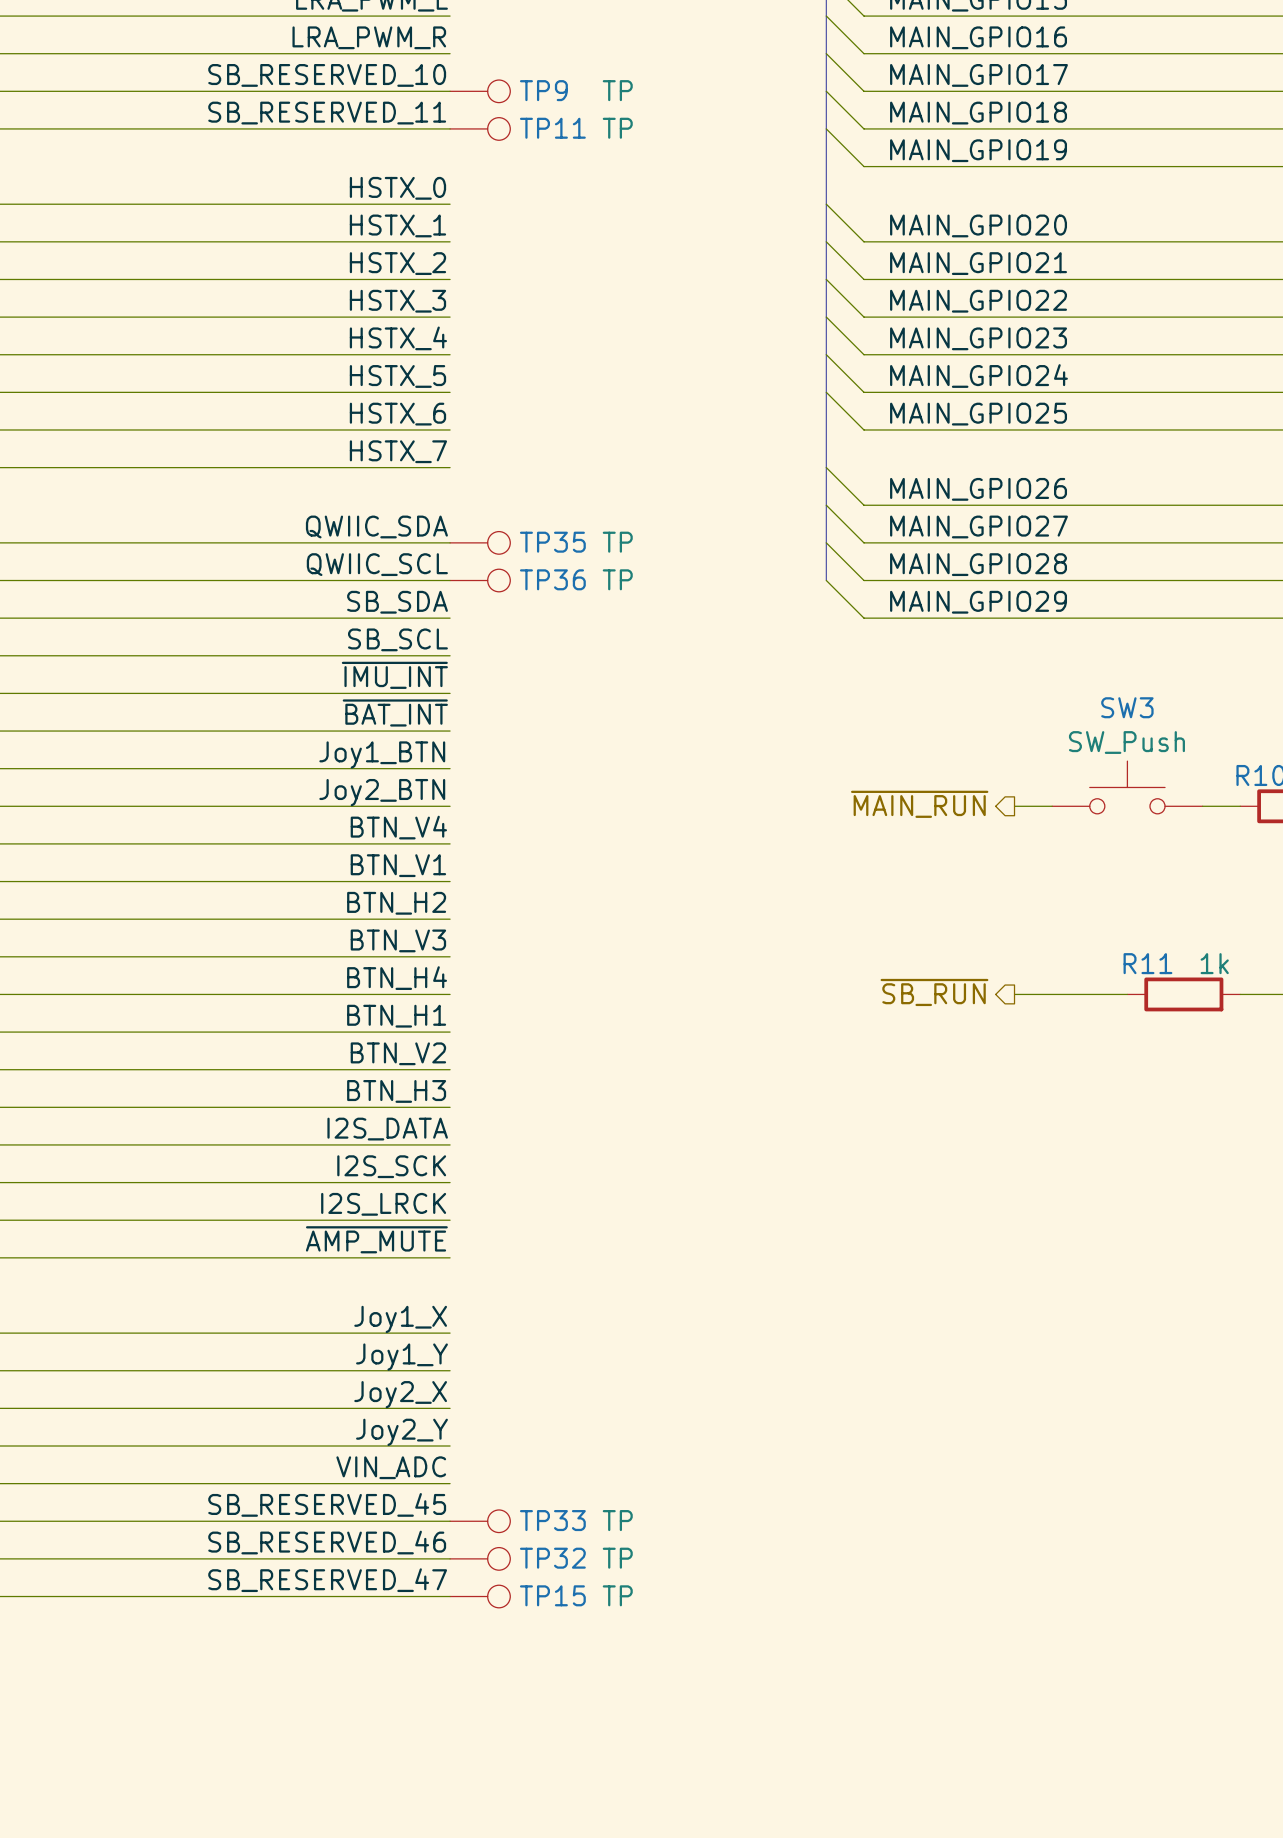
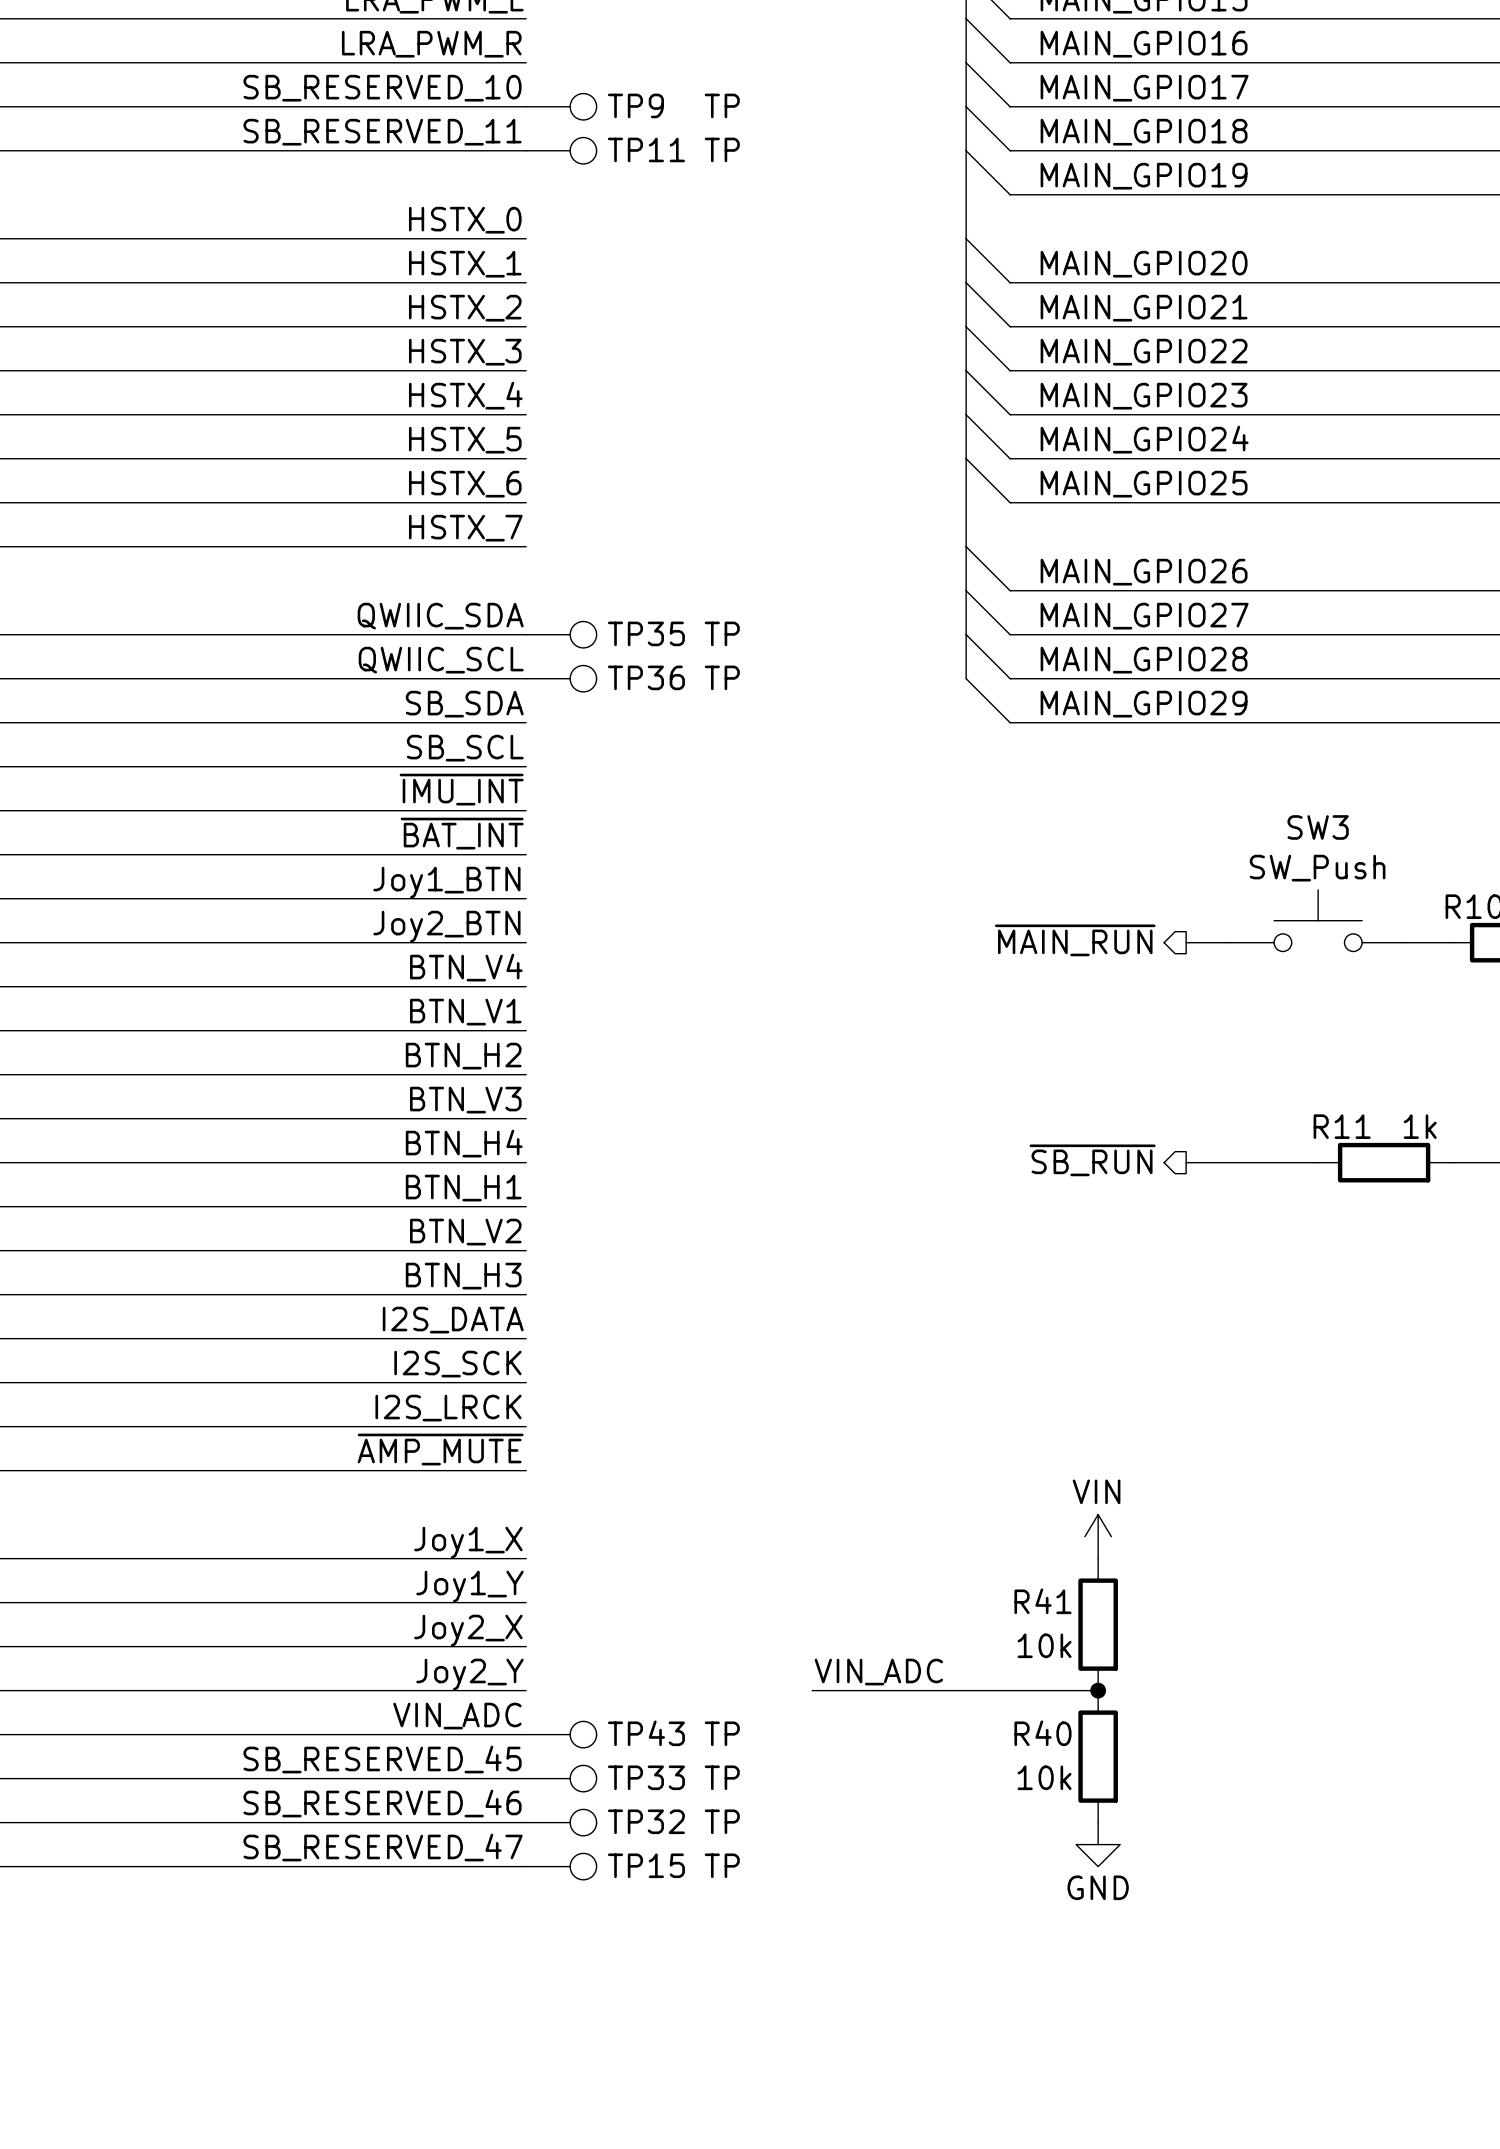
power symbol: none -> VIN (1098, 1536)
R41: none -> 10k (1098, 1624)
label: none -> VIN_ADC (878, 1672)
wire: none -> (812, 1690) (1098, 1690)
junction: none -> (1098, 1690)
TP43: none -> TP (561, 1734)
R40: none -> 10k (1098, 1756)
power symbol: none -> GND (1098, 1844)

